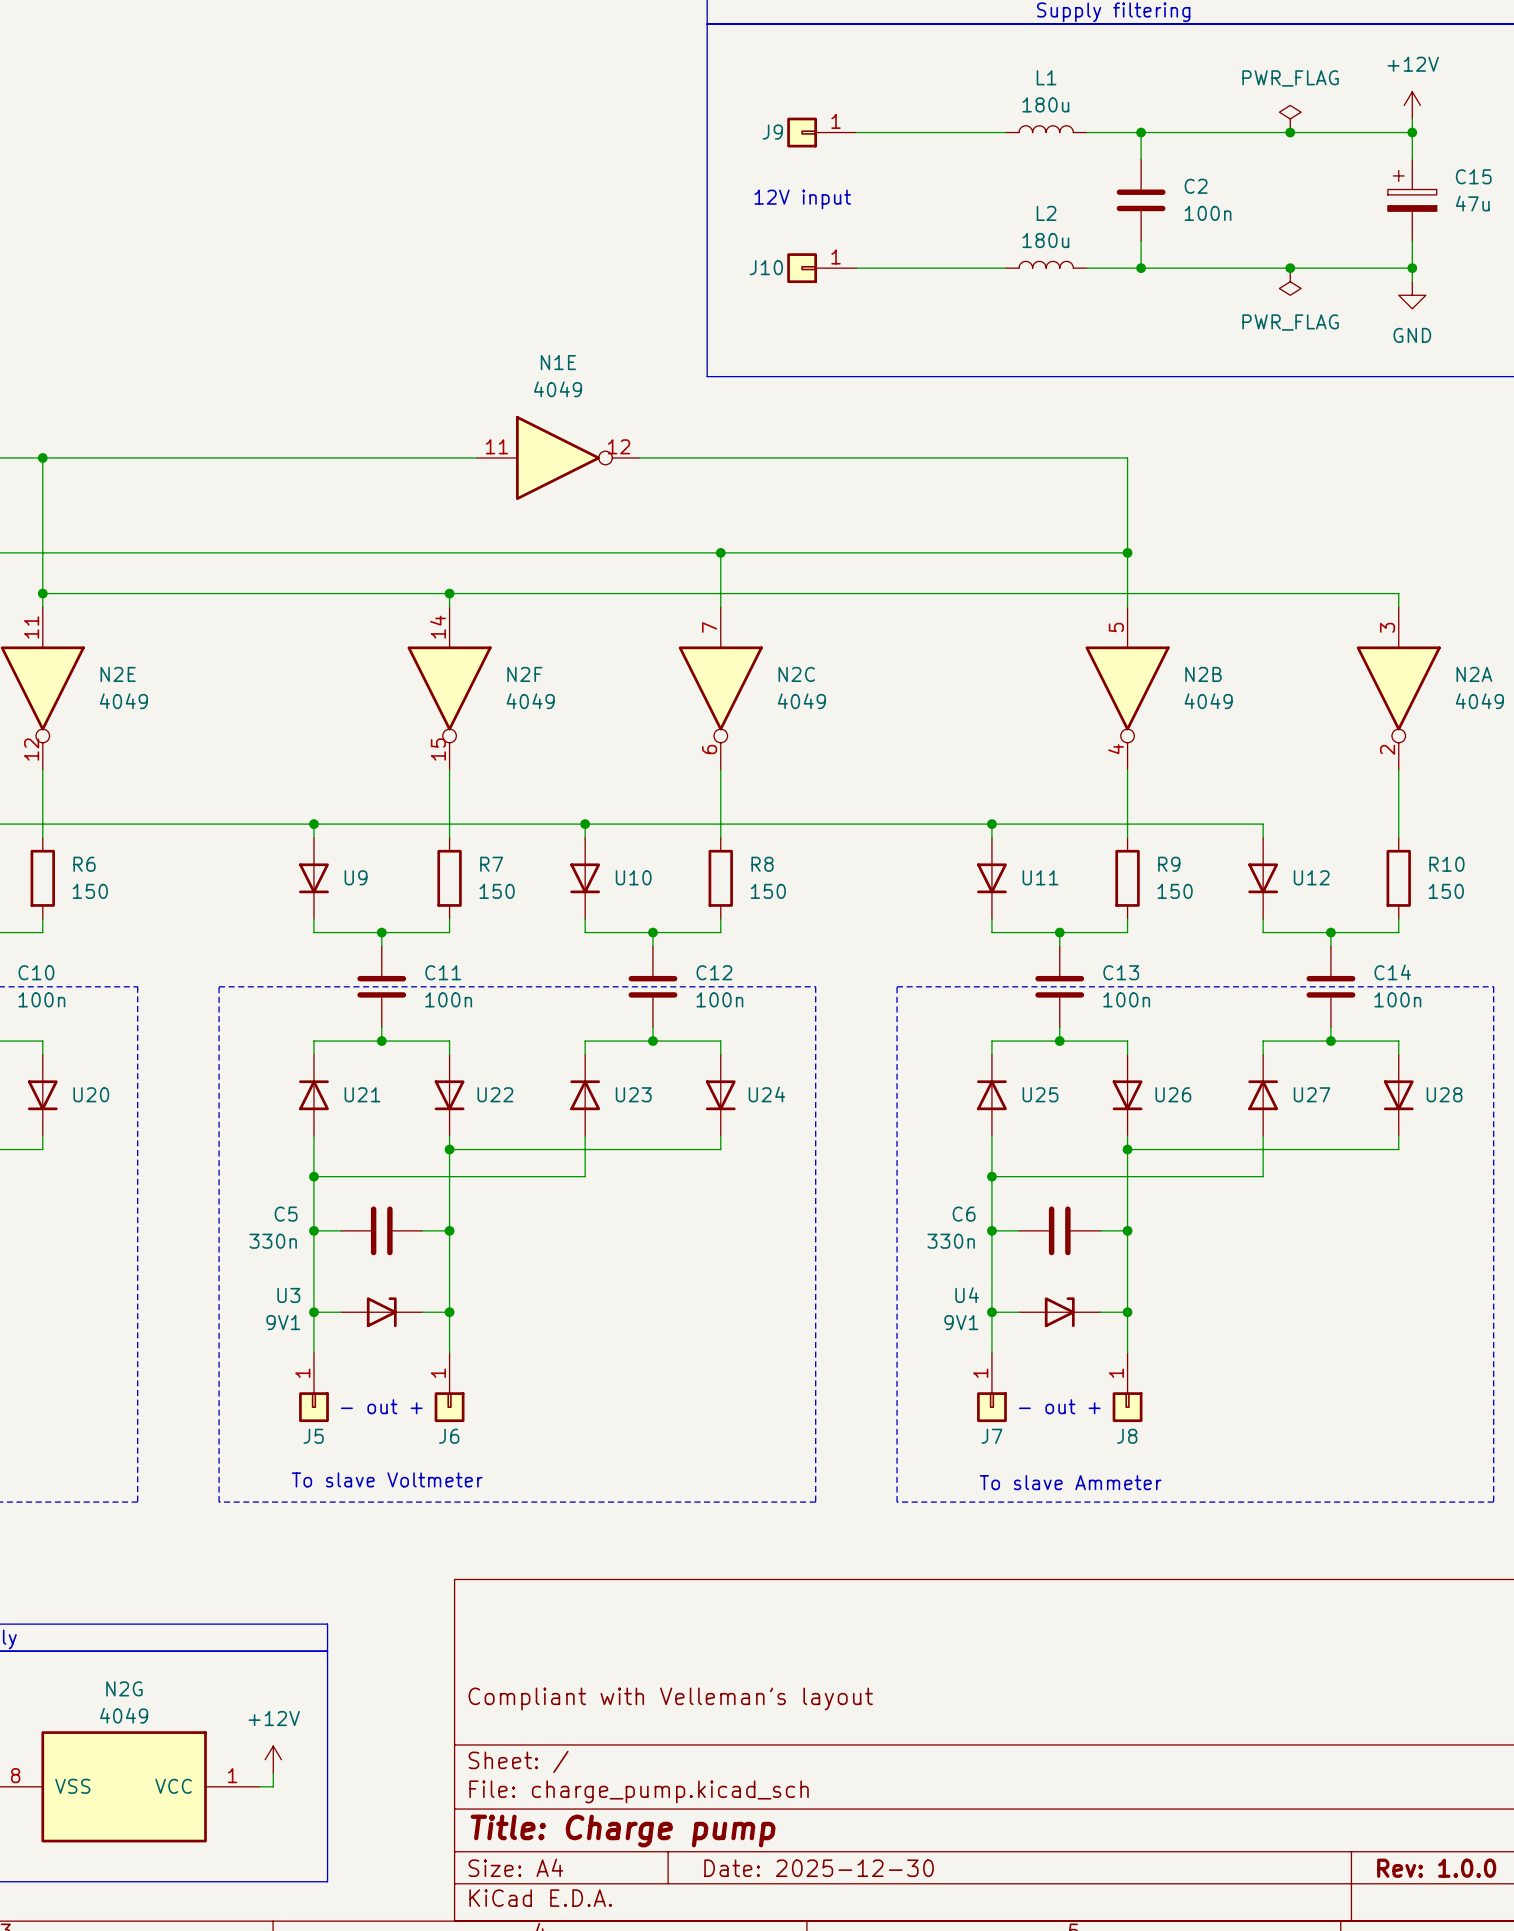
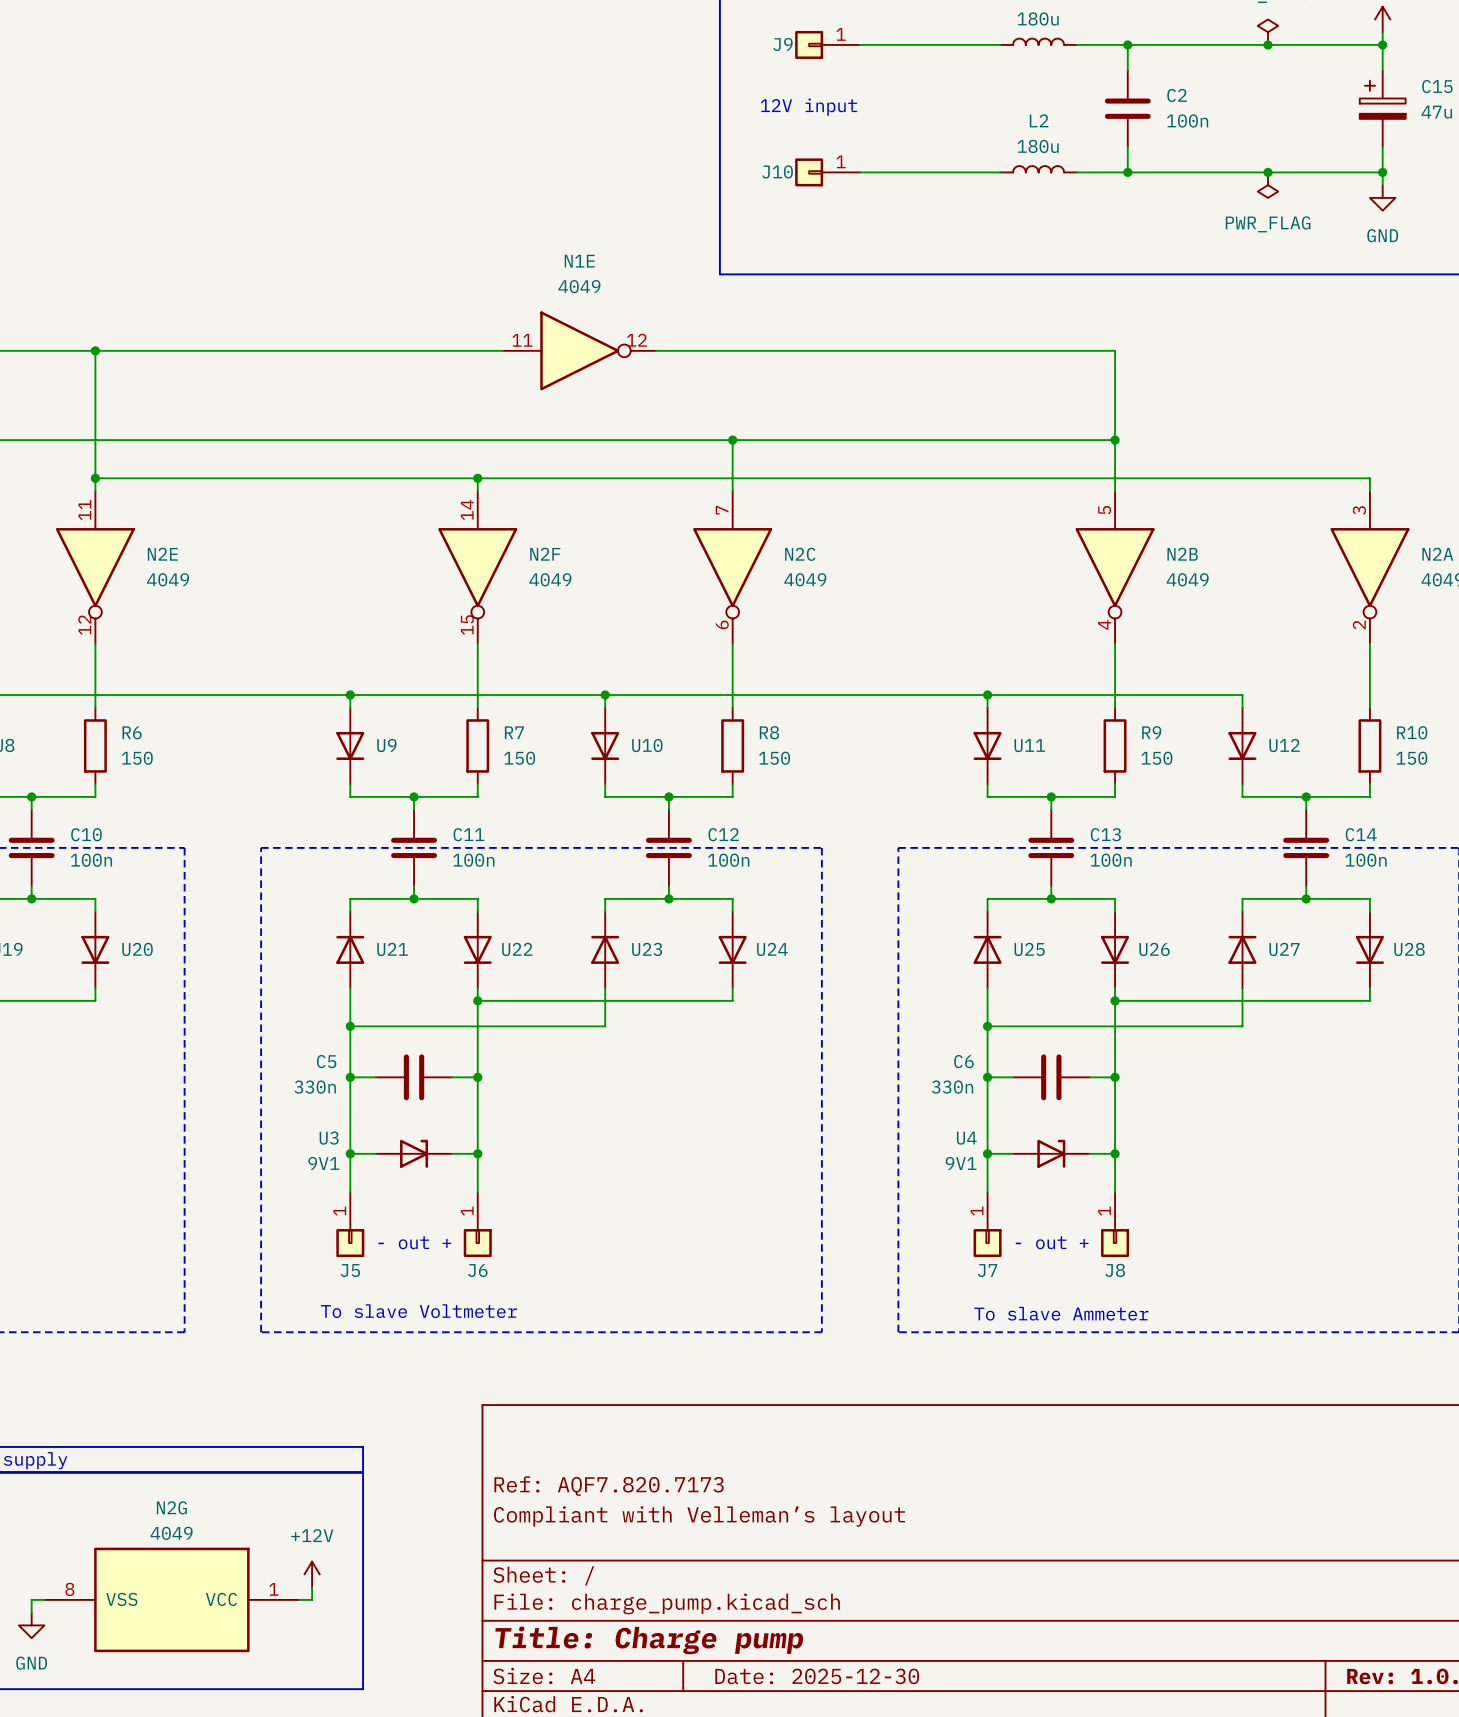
title block: none -> Ref: AQF7.820.7173 (609, 1486)

